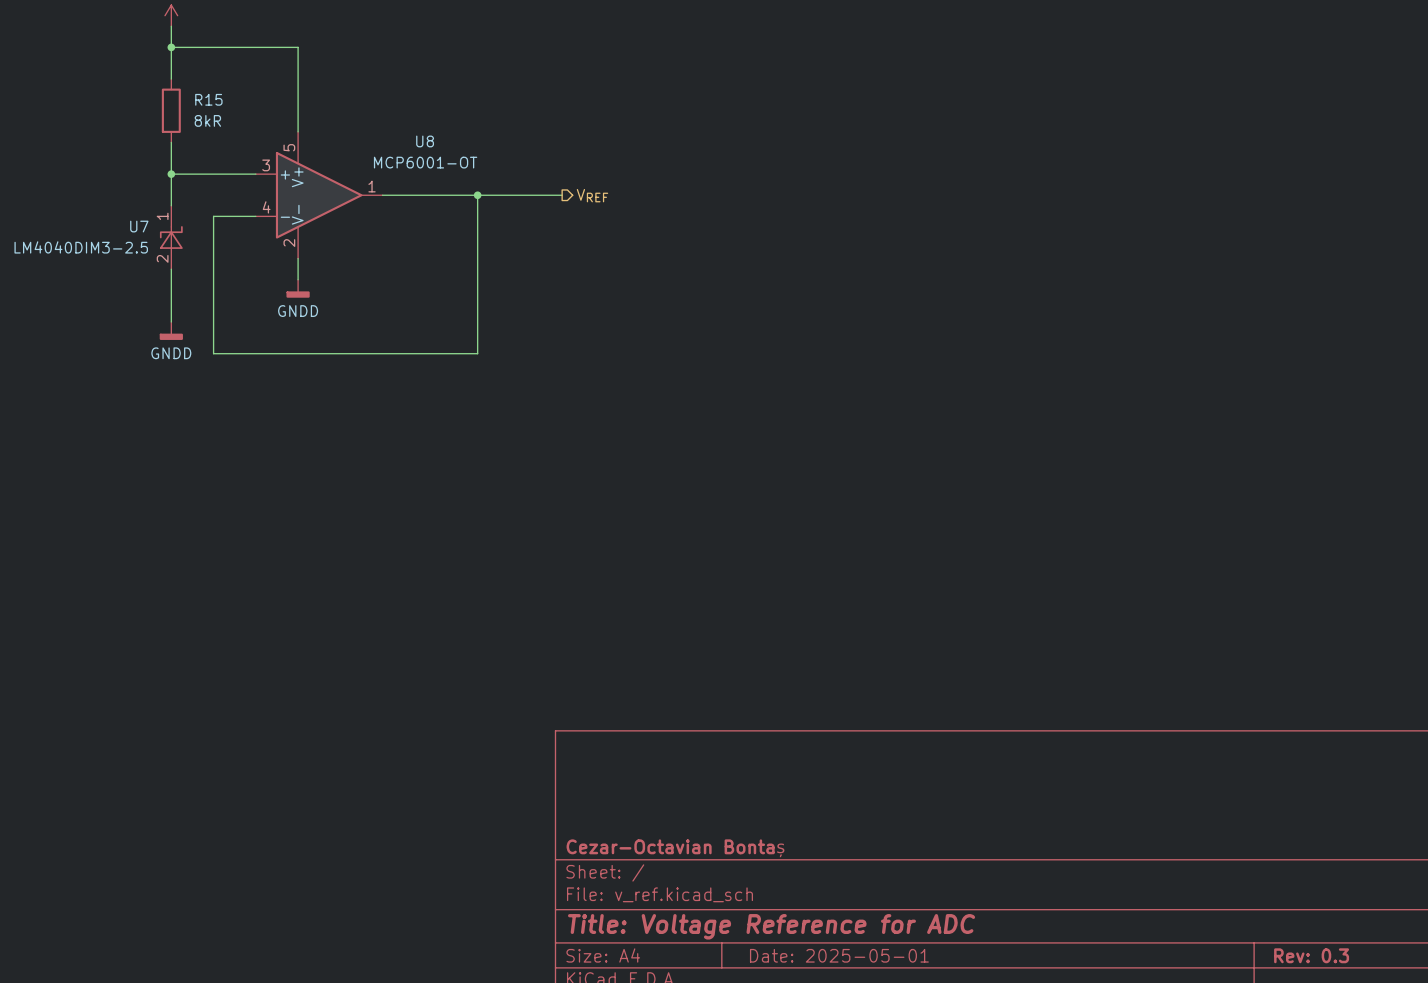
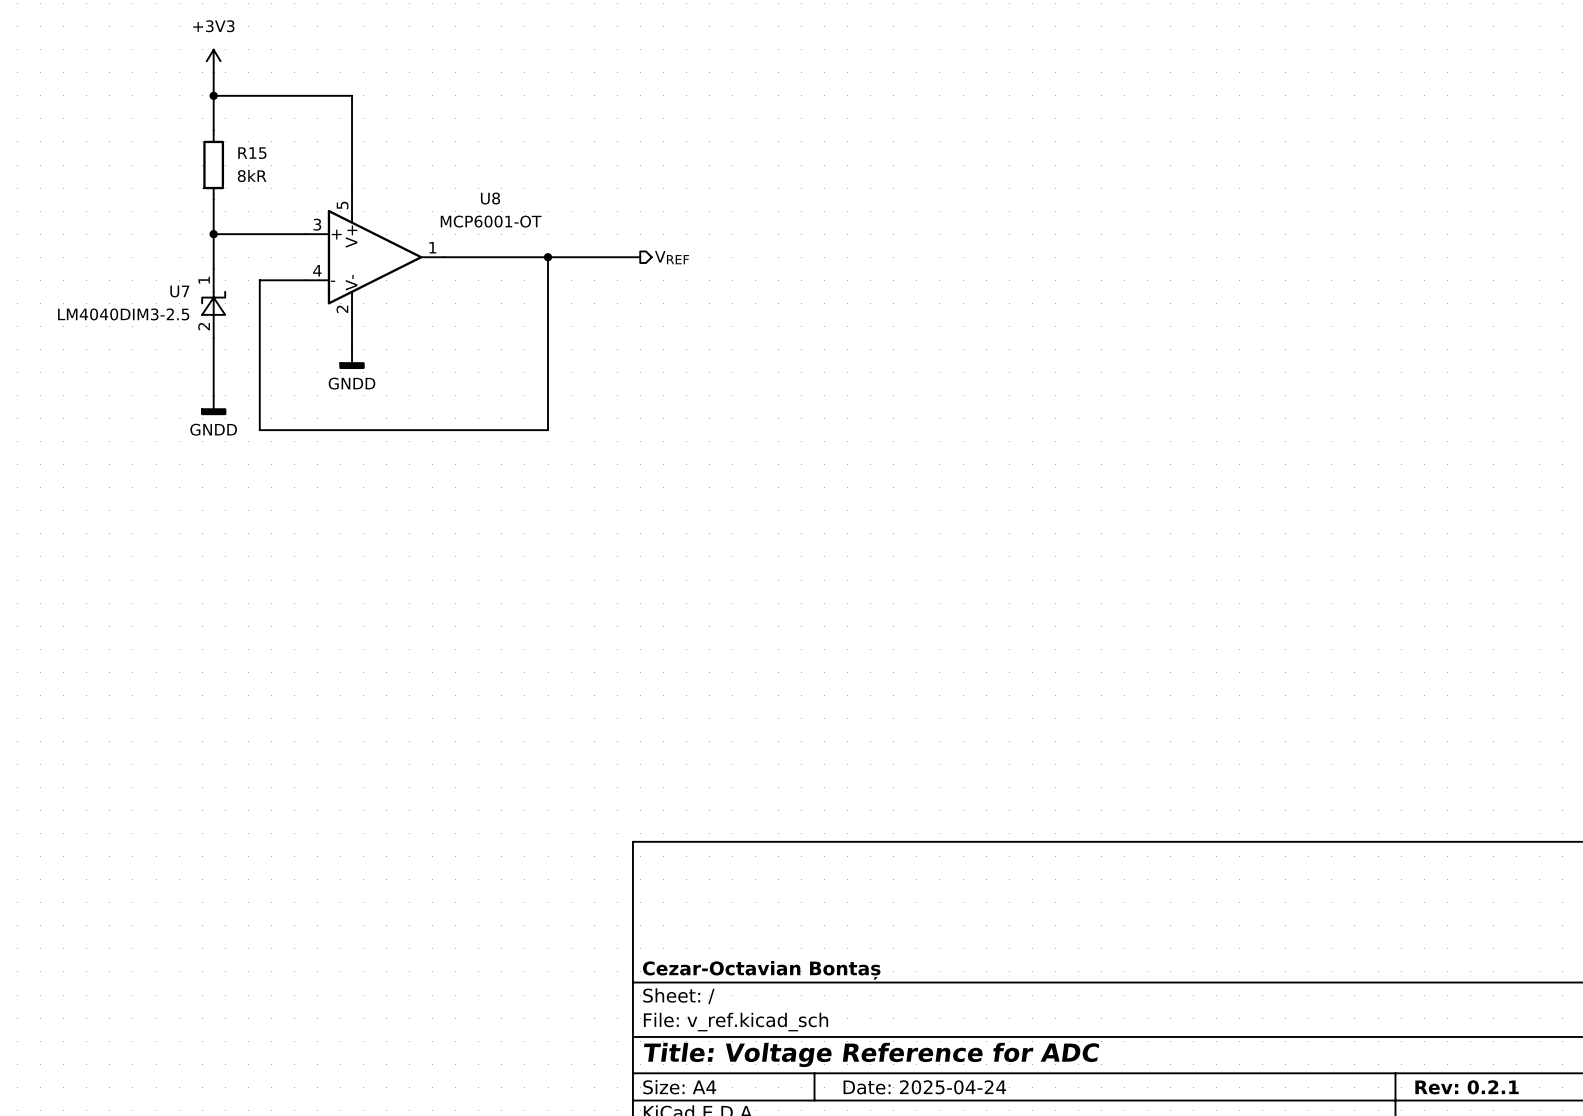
title block: Date: 2025-05-01 (839, 955) -> Date: 2025-04-24 (924, 1087)
title block: Rev: 0.3 (1311, 955) -> Rev: 0.2.1 (1467, 1087)

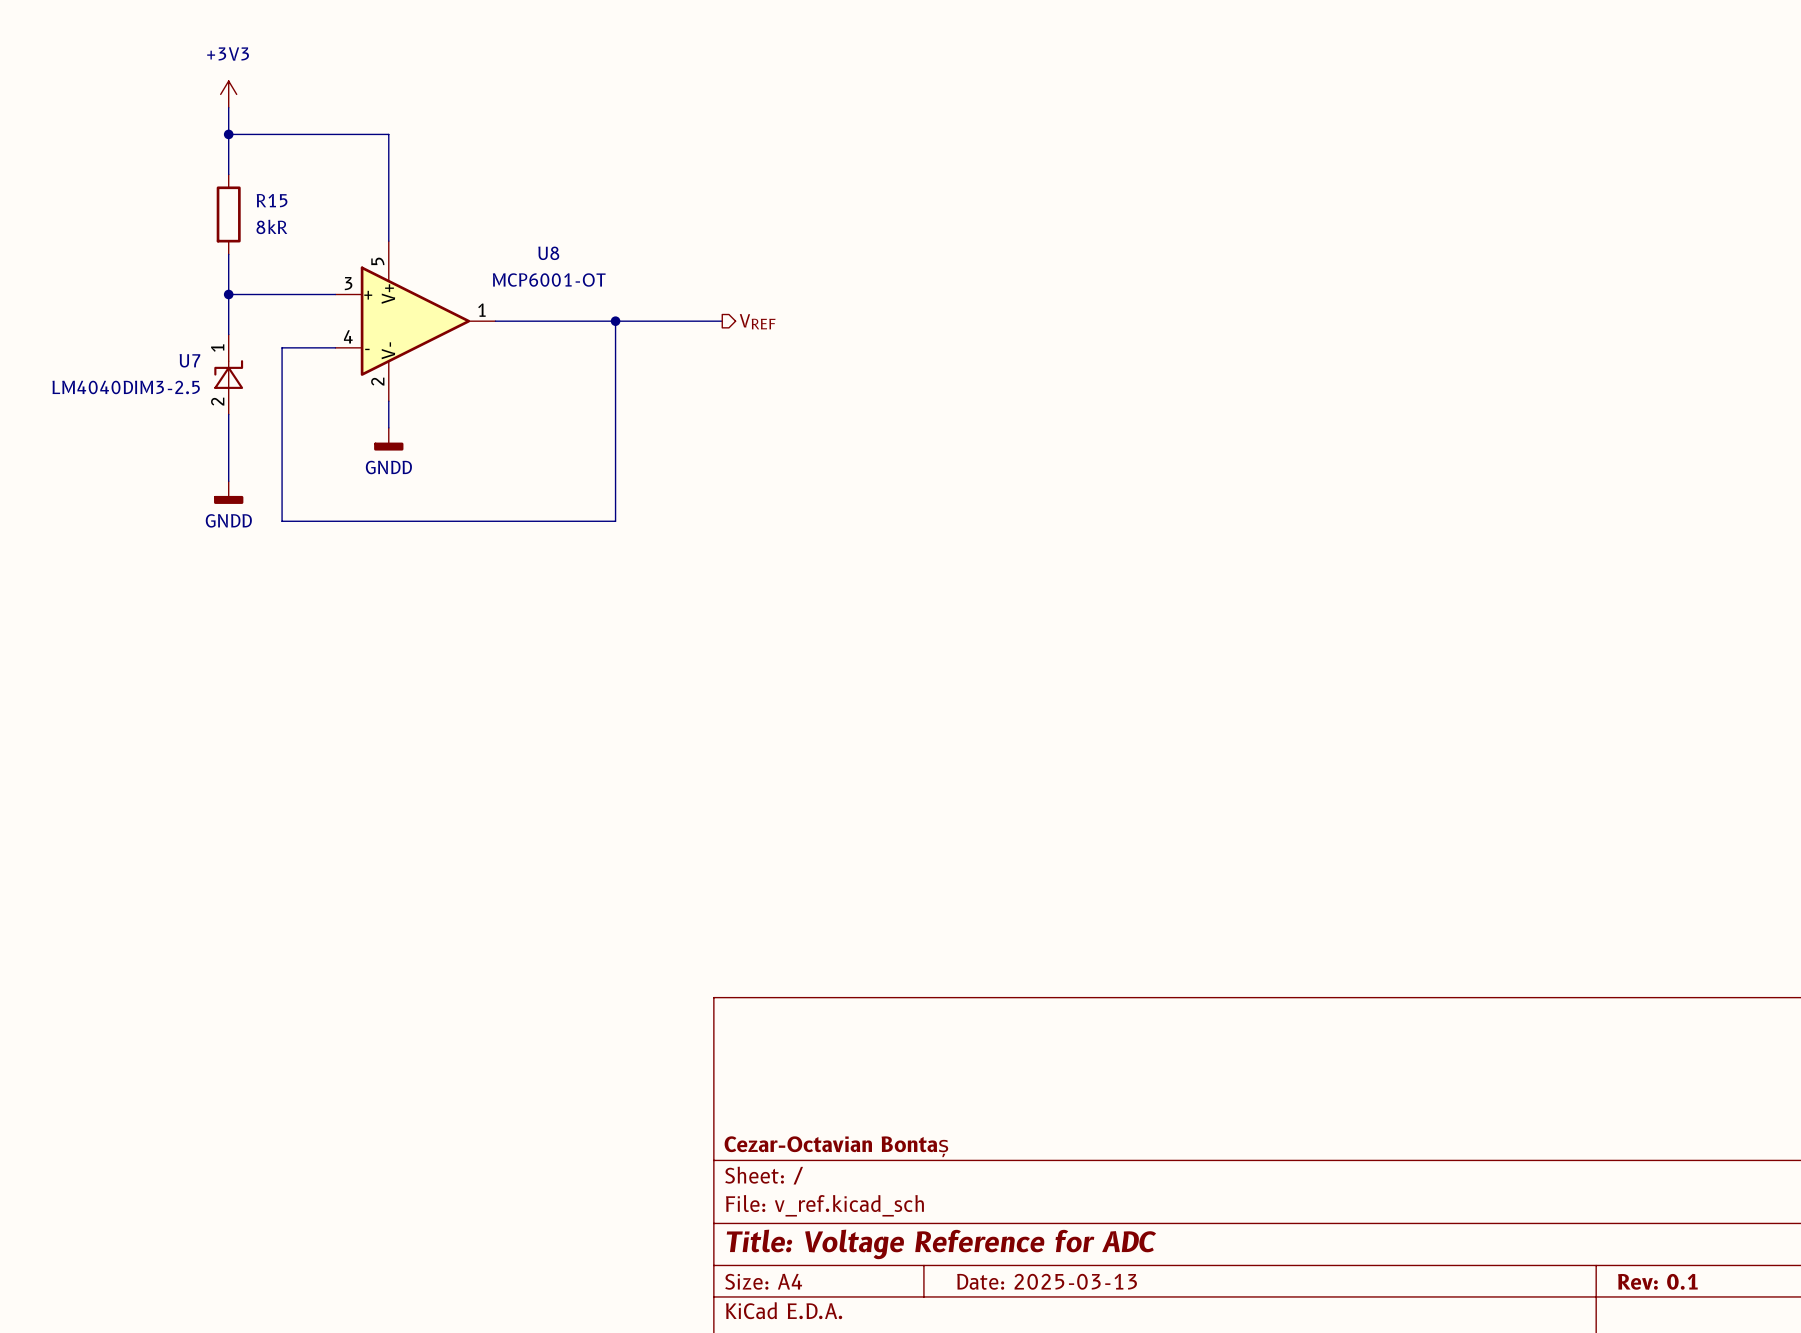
title block: Date: 2025-04-24 (924, 1087) -> Date: 2025-03-13 (1047, 1281)
title block: Rev: 0.2.1 (1467, 1087) -> Rev: 0.1 (1657, 1281)

